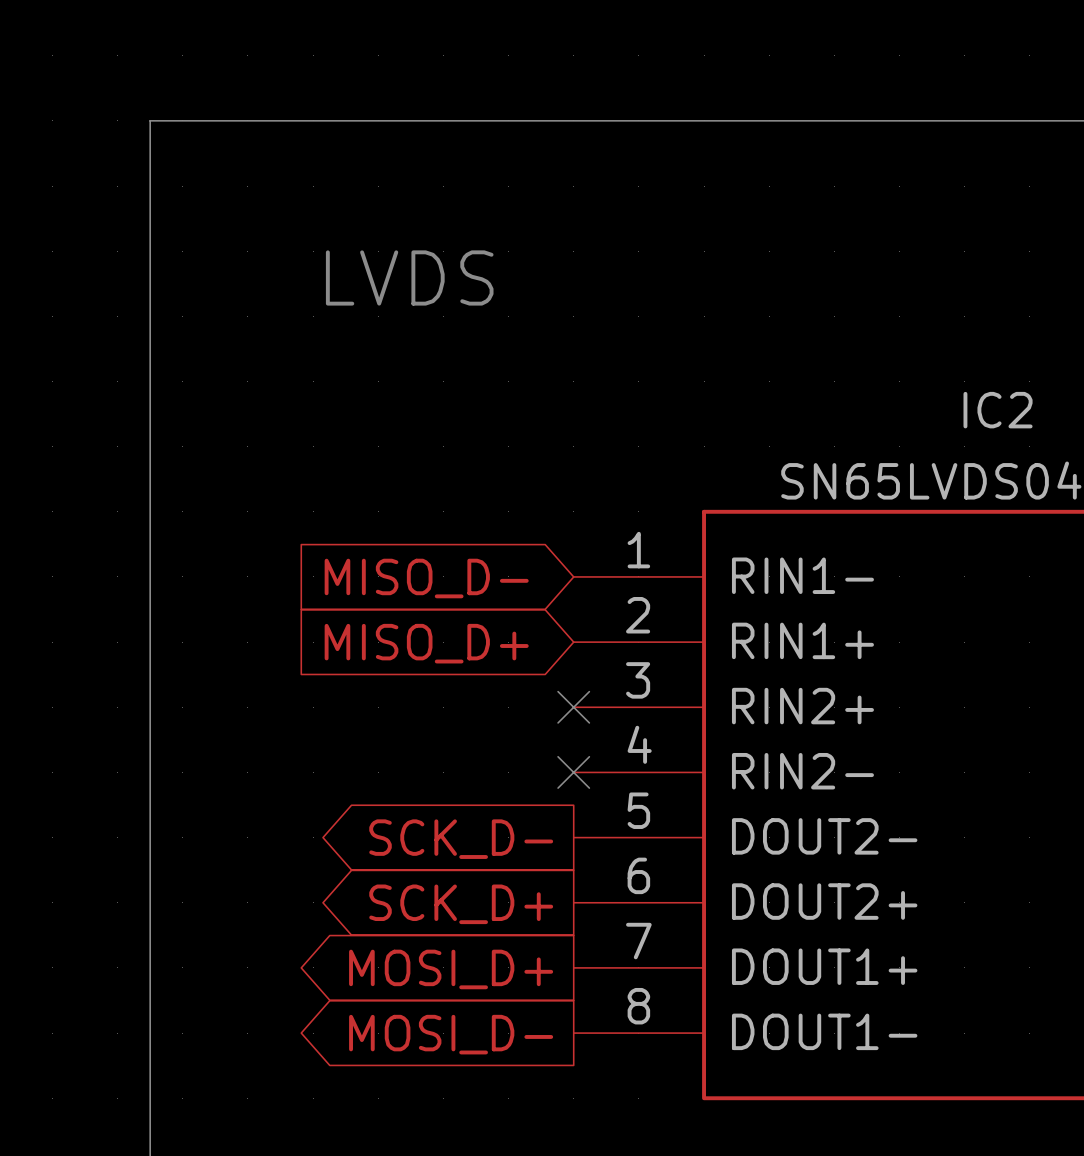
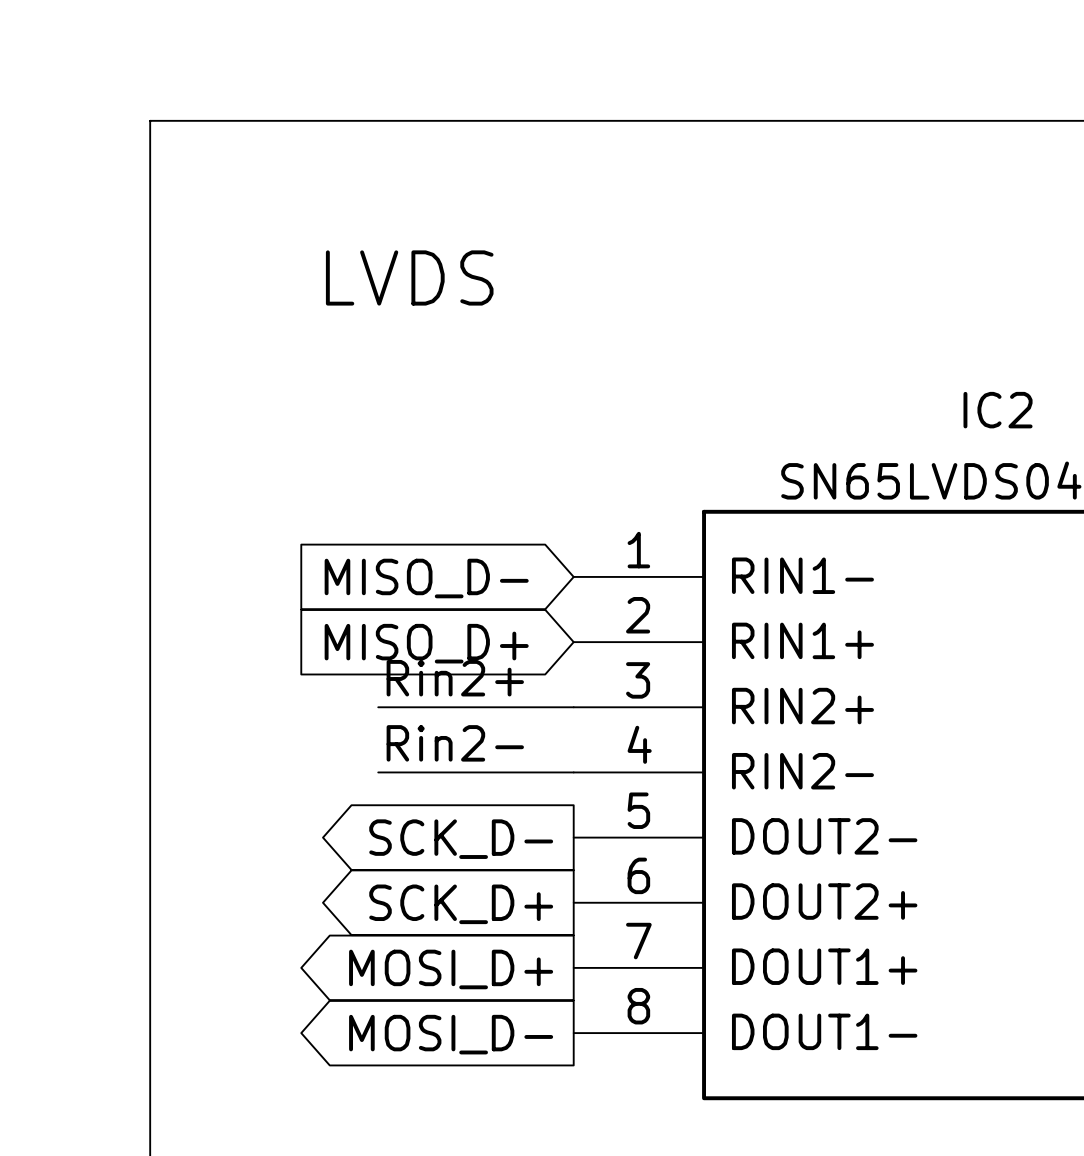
label: none -> Rin2+ (455, 678)
wire: none -> (378, 707) (573, 707)
no-connect mark: (573, 707) -> none
label: none -> Rin2- (455, 743)
wire: none -> (378, 772) (573, 772)
no-connect mark: (573, 772) -> none

